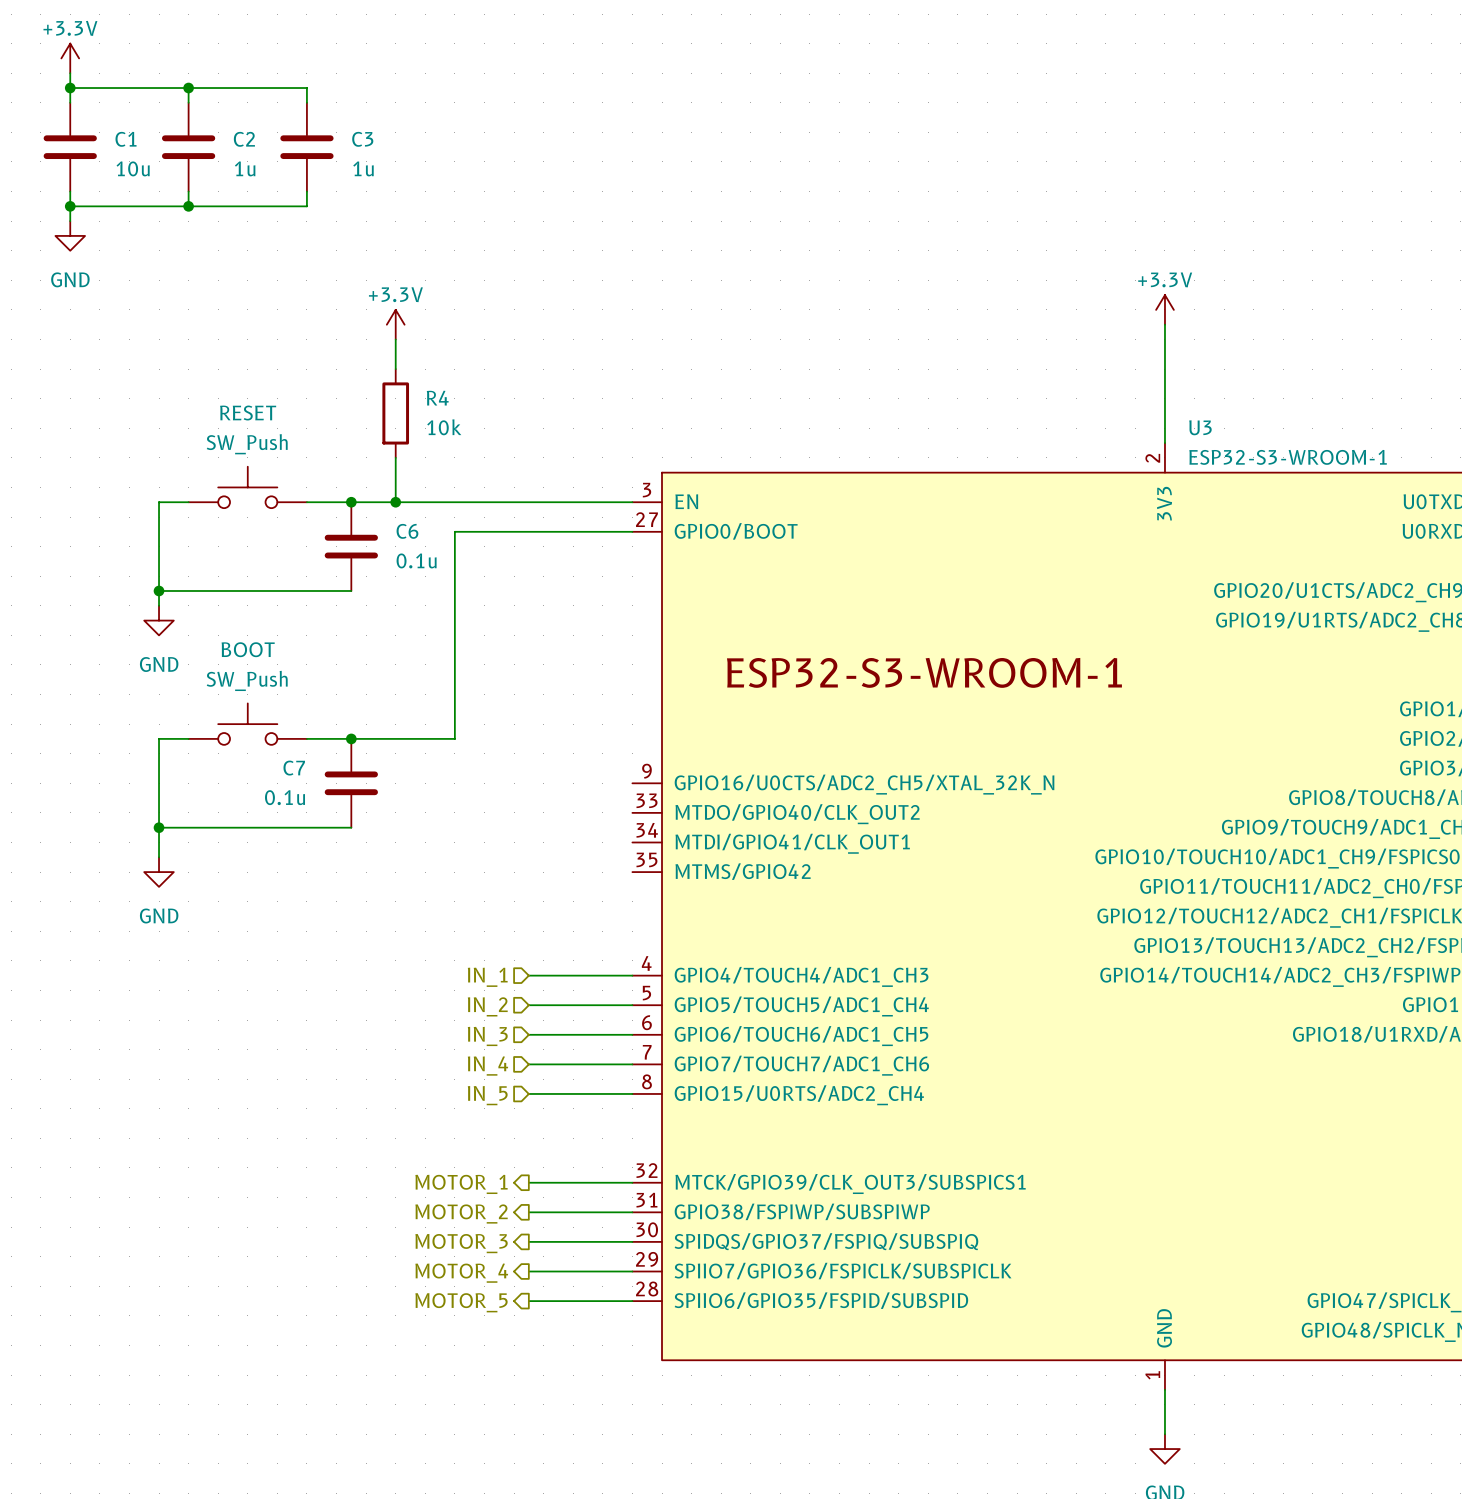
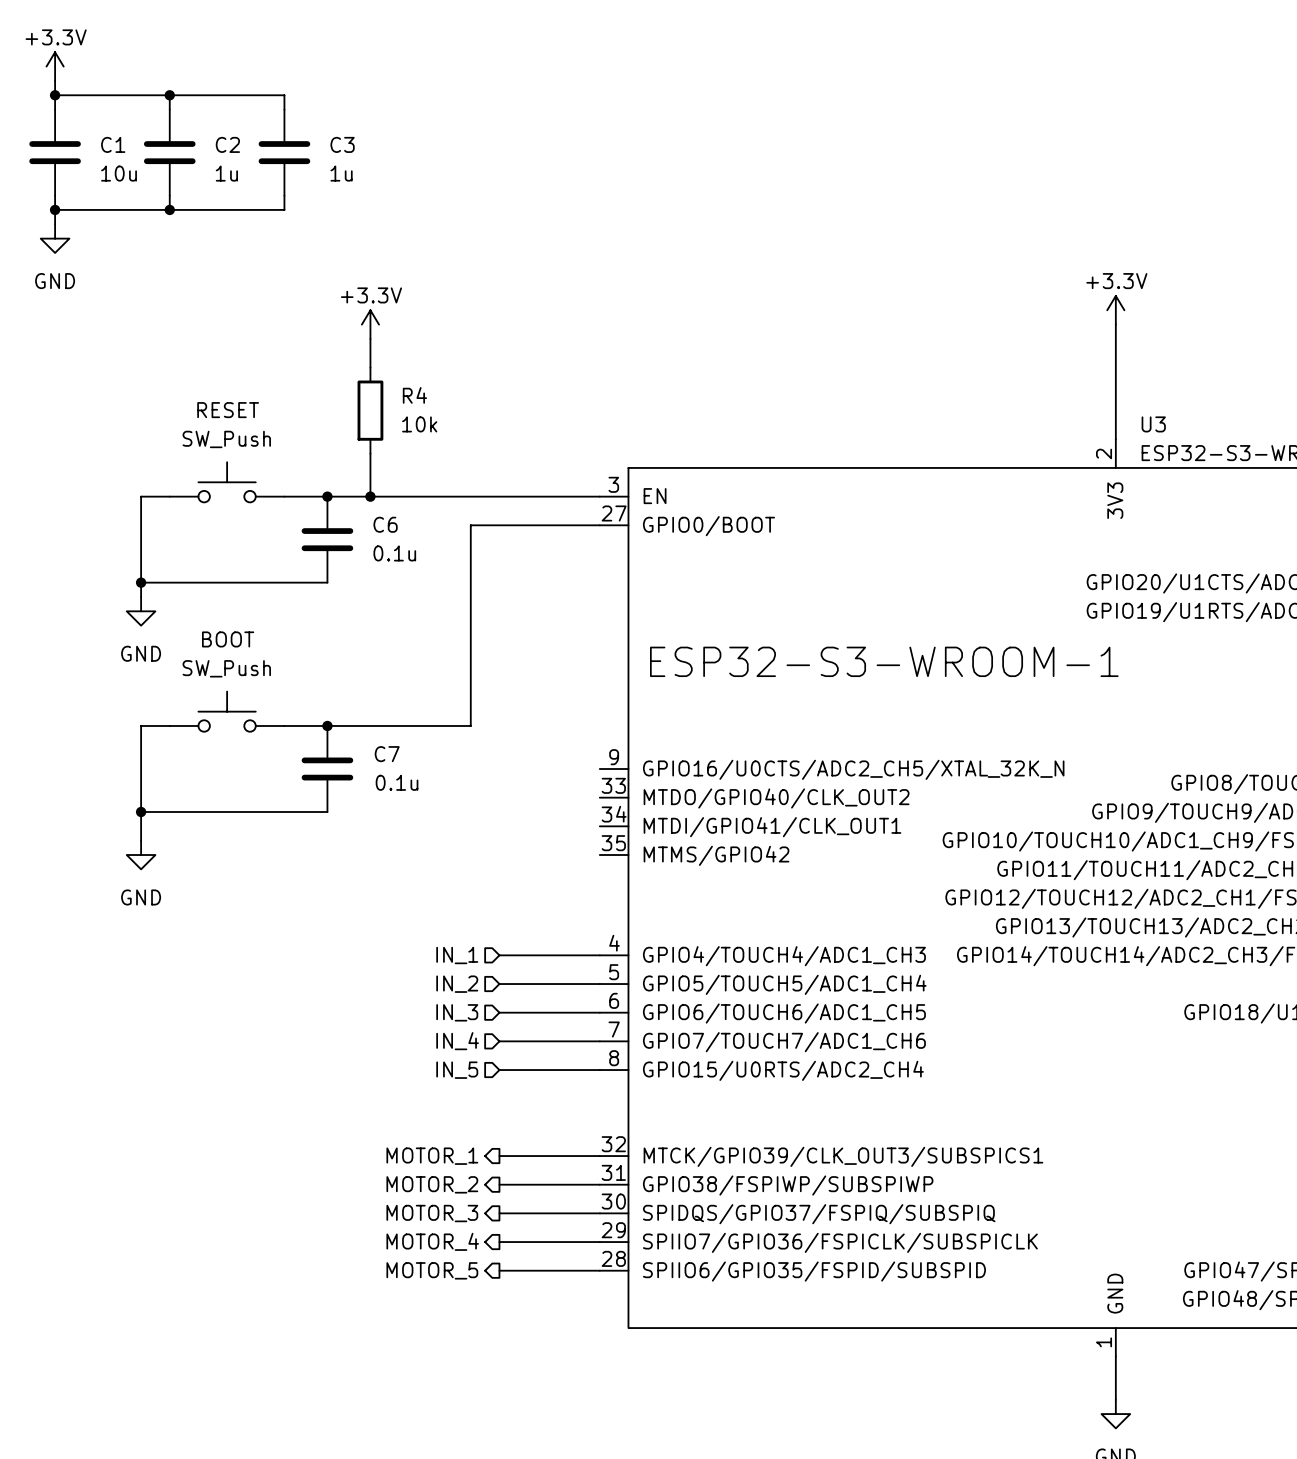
wire: (499, 531) (454, 531) (454, 738) -> (470, 525) (470, 725) (427, 725)
C7 name position: C7 (294, 768) -> C7 (387, 754)
C7 value position: 0.1u (285, 797) -> 0.1u (397, 782)

